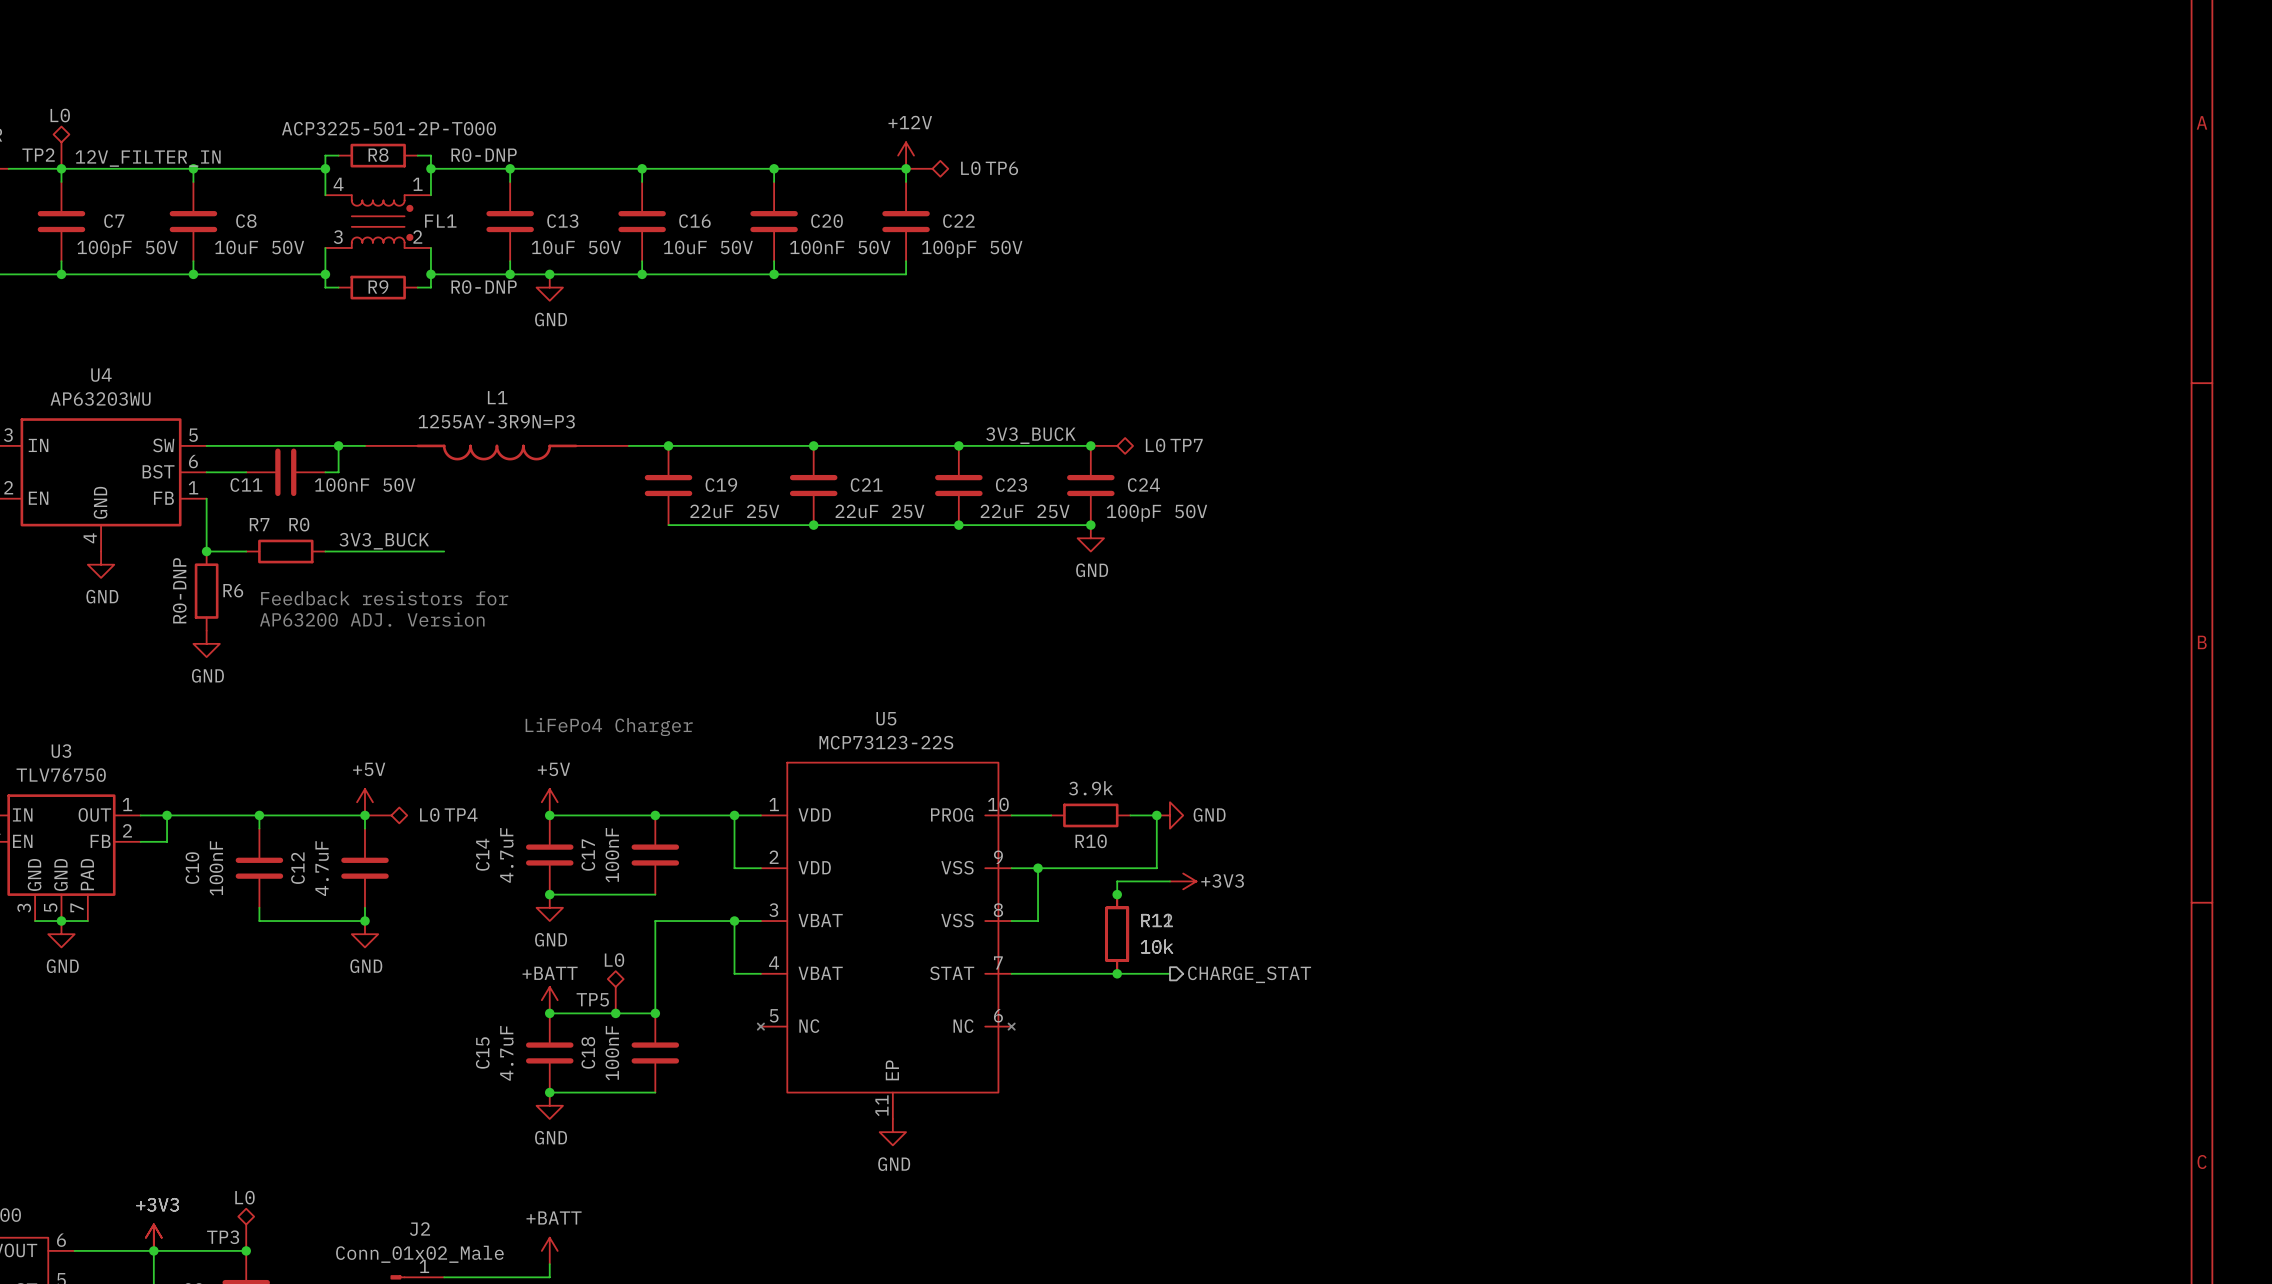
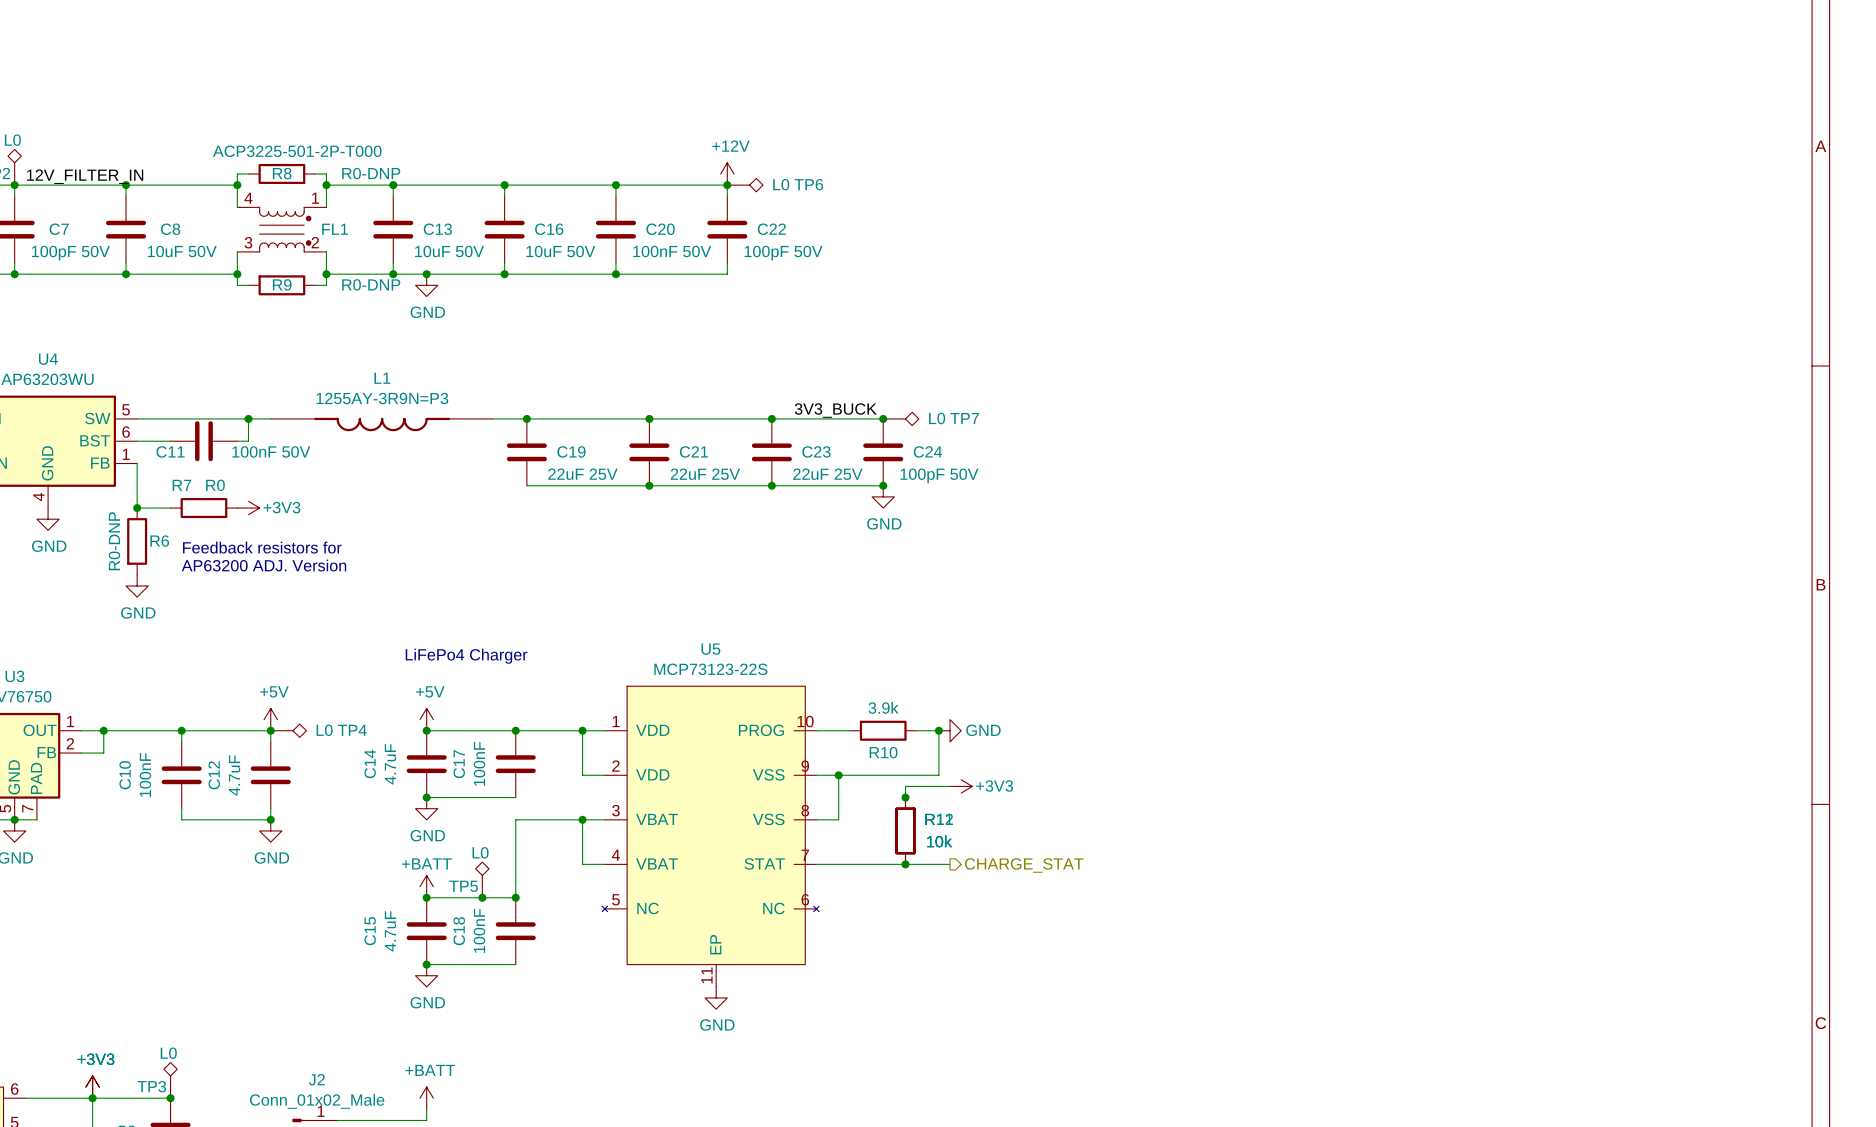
label: 3V3_BUCK (384, 541) -> none
wire: (325, 551) (444, 551) -> none
power symbol: none -> +3V3 (248, 508)

